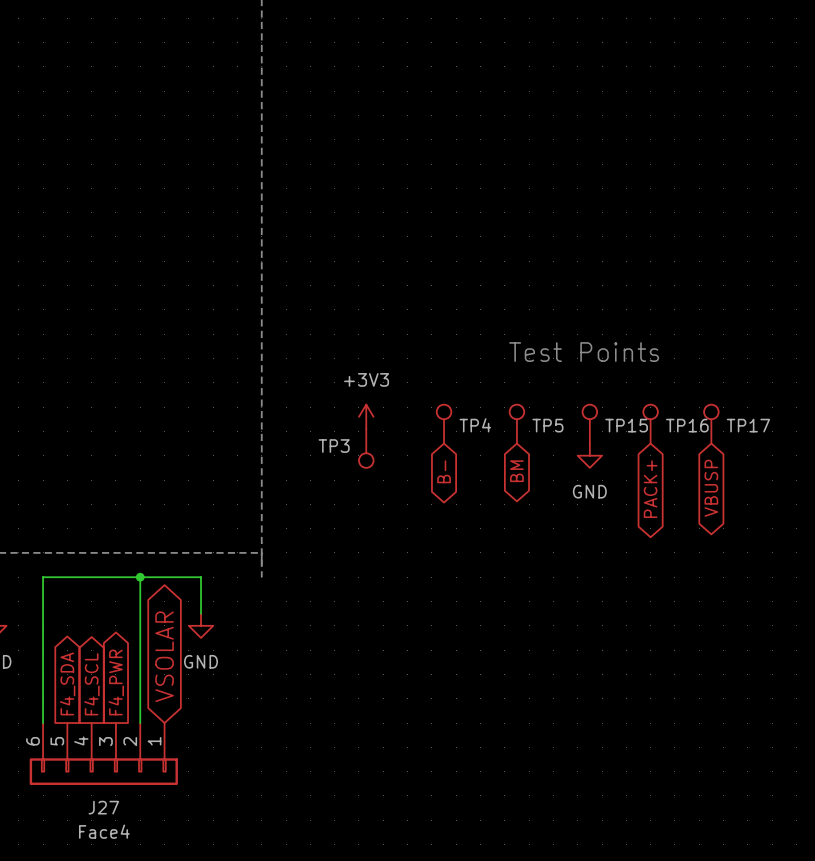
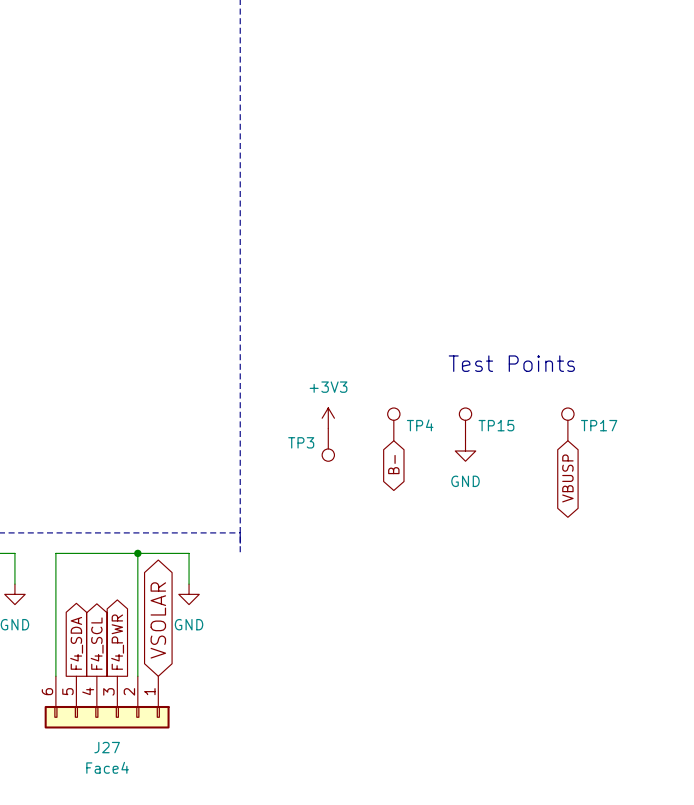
TP5: (516, 424) -> none
TP15 position: (589, 424) -> (465, 424)
TP17: (711, 424) -> none
TP16 name: TP16 (687, 425) -> TP17 (599, 425)
power symbol position: GND (589, 455) -> GND (465, 451)
global label: BM (516, 471) -> none
global label: VBUSP (711, 488) -> none
global label: PACK+ (650, 489) -> VBUSP (567, 478)

